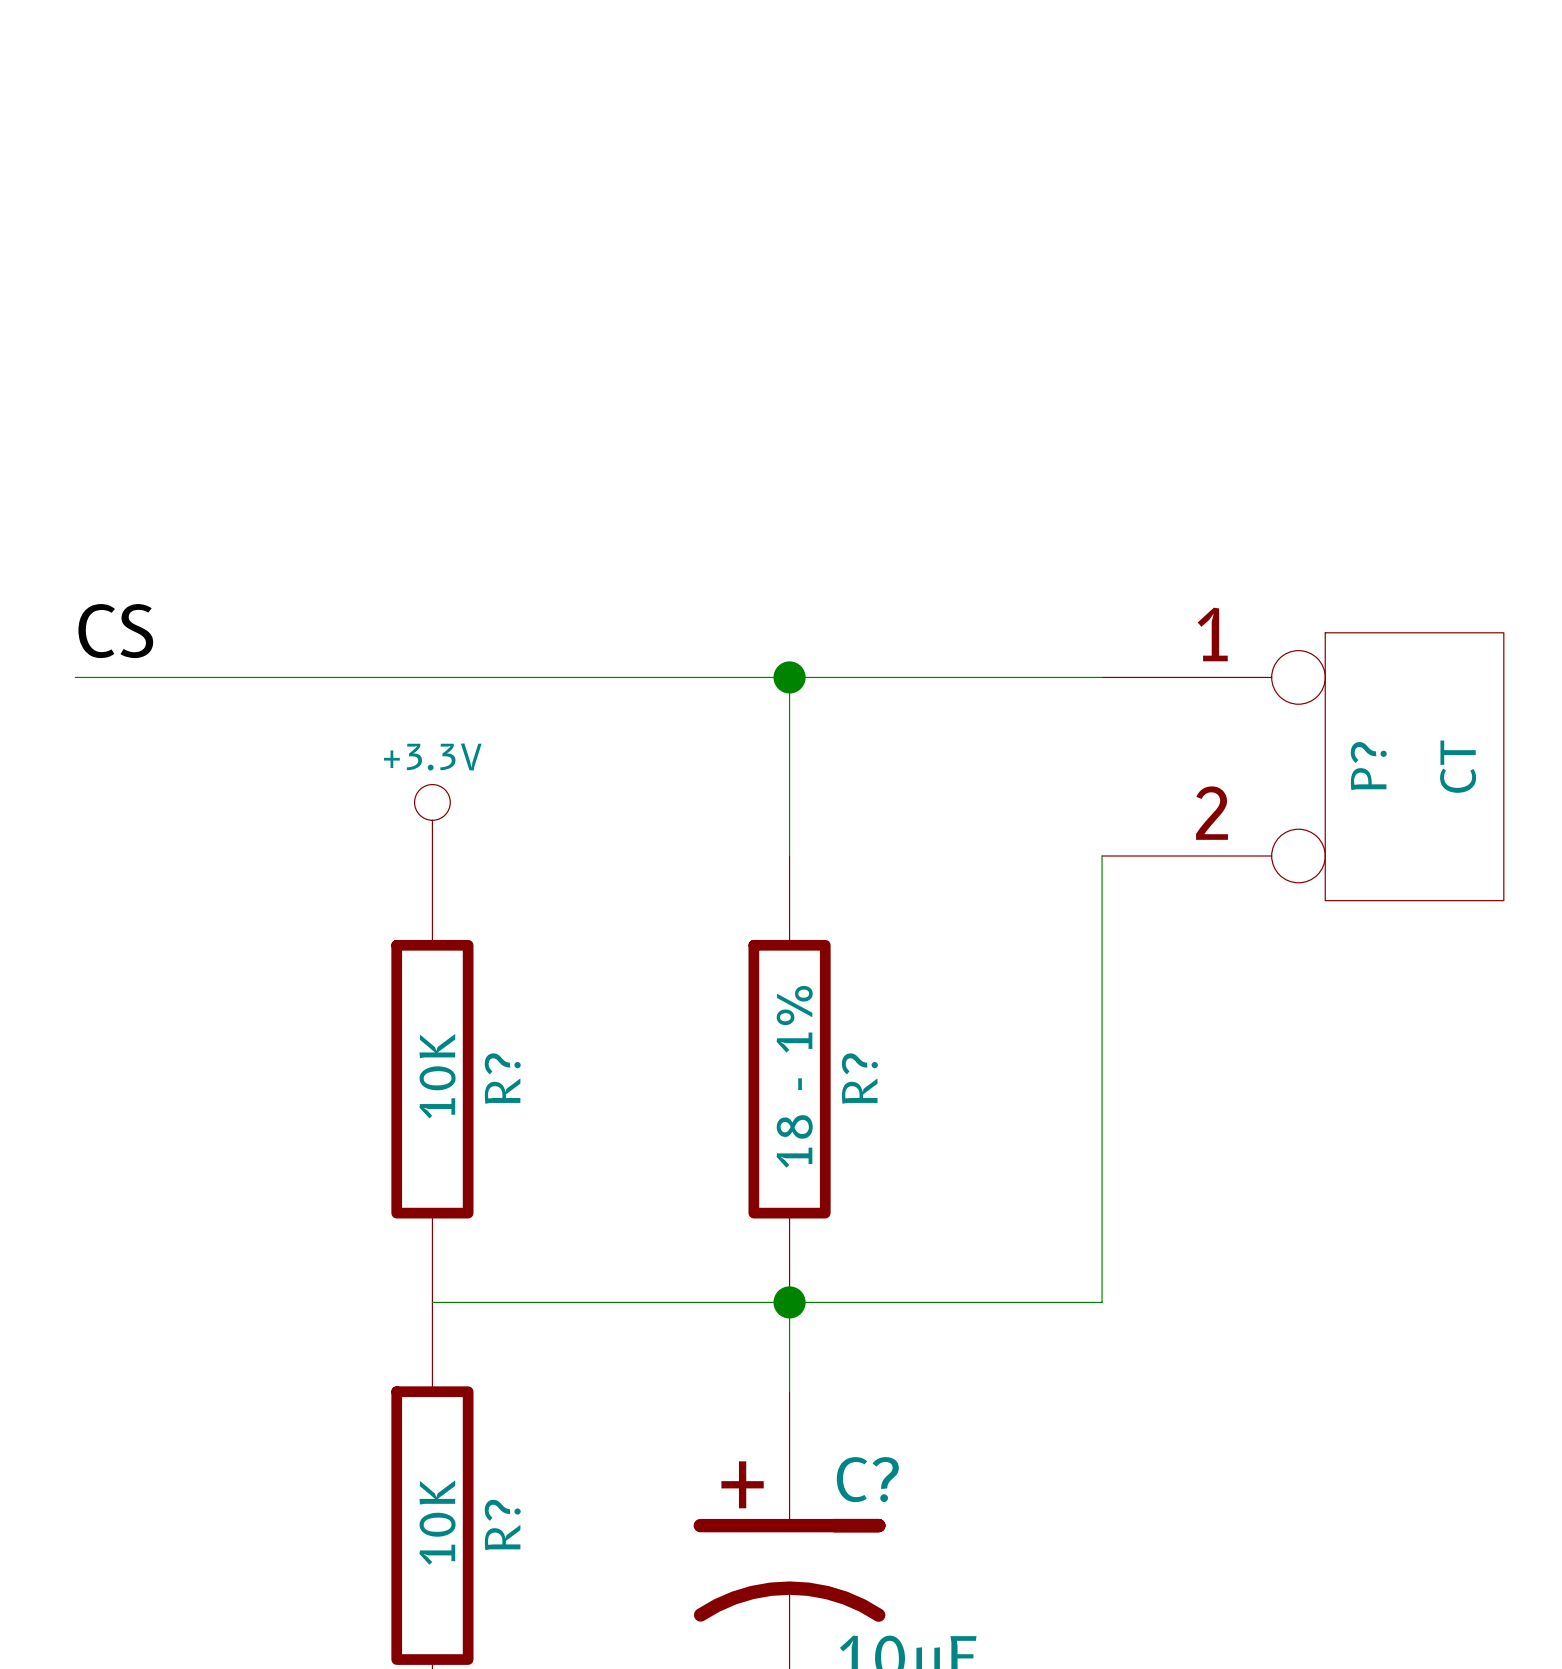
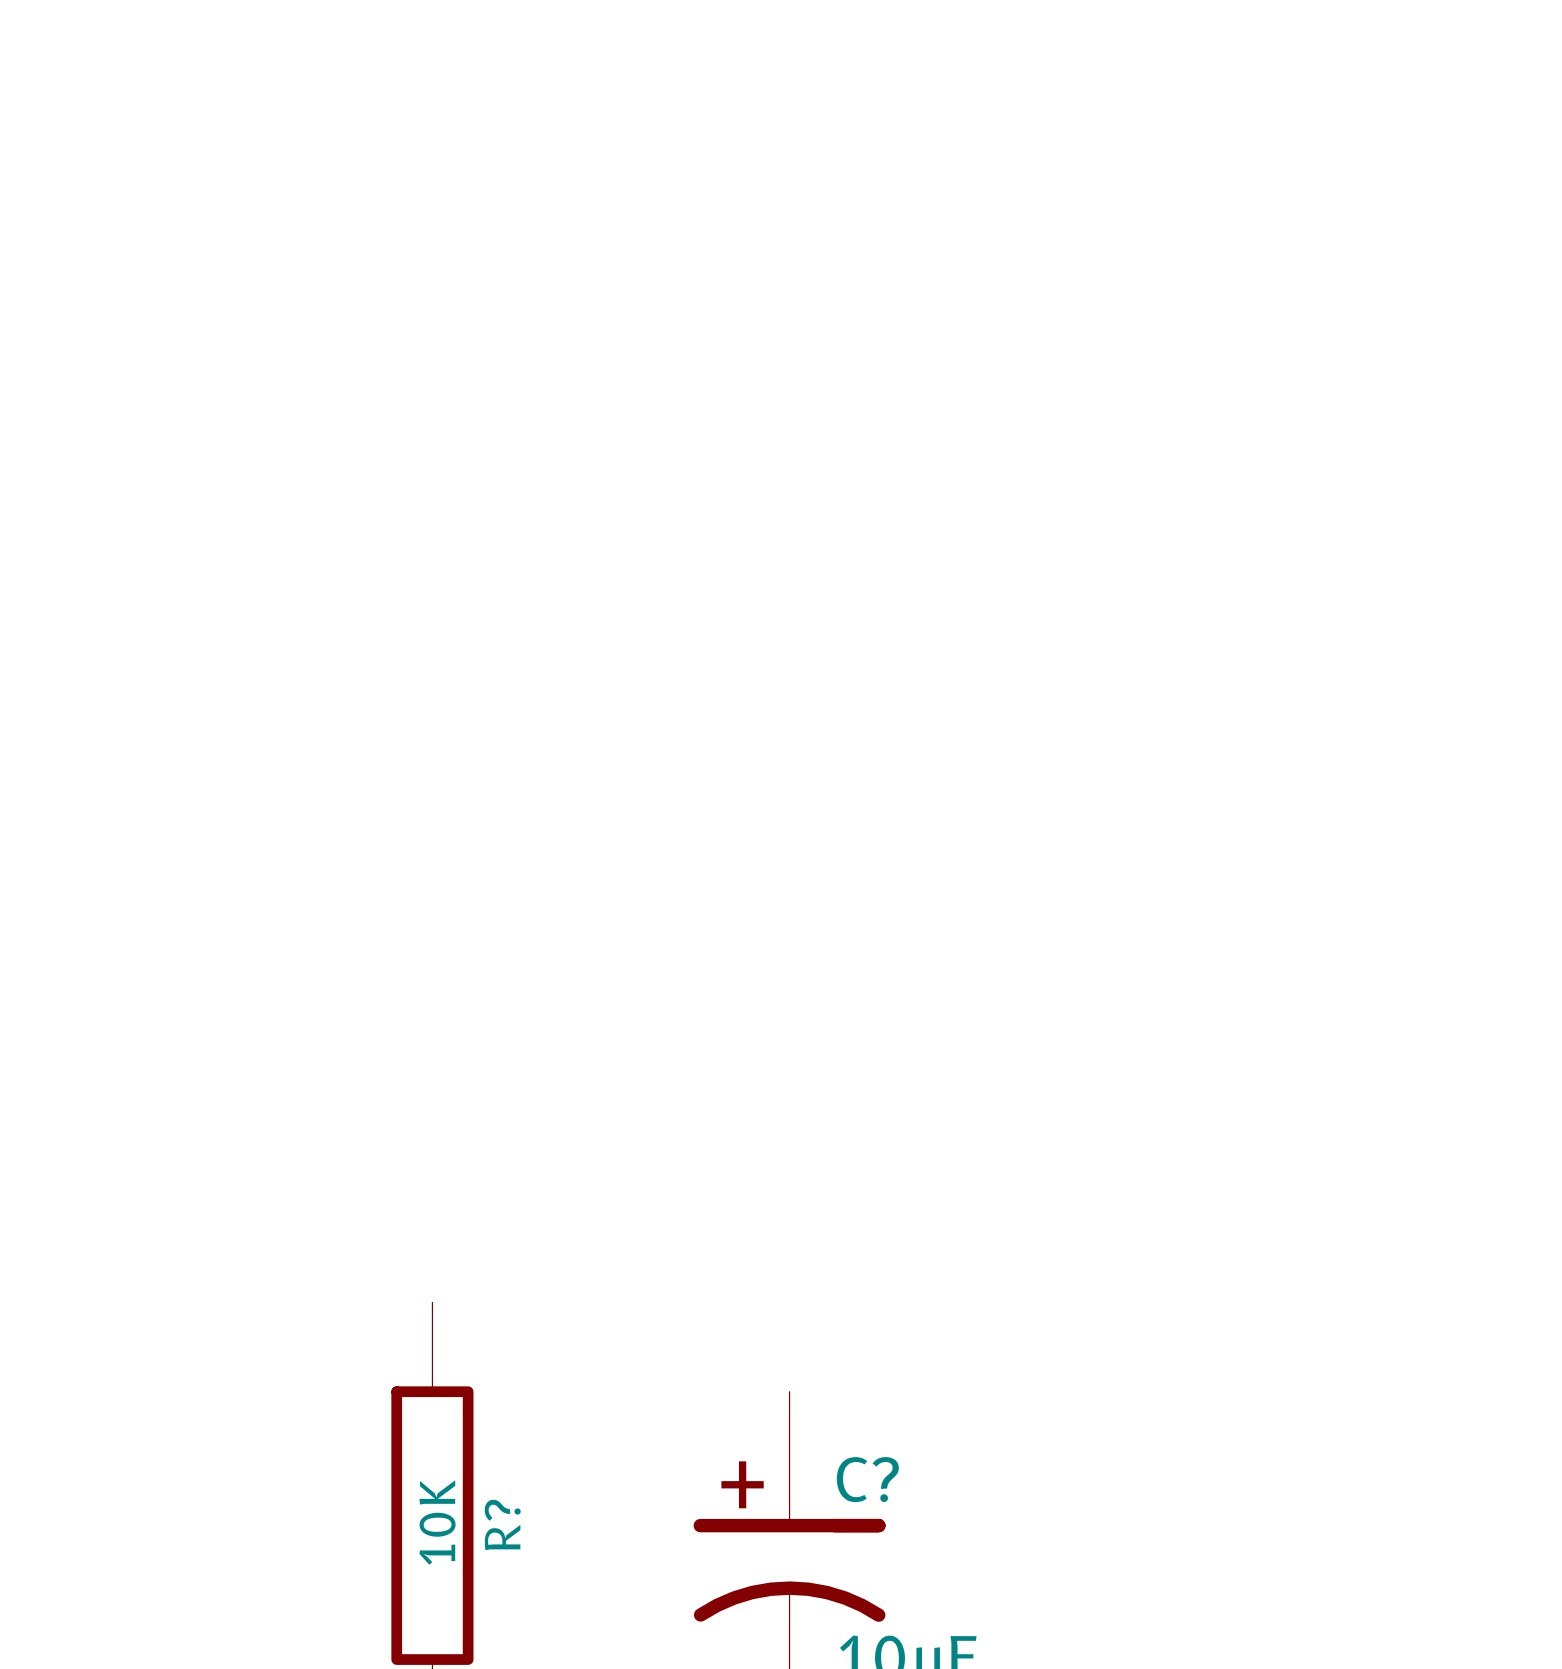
label: CS (115, 631) -> none
wire: (75, 677) (1102, 677) -> none
wire: (789, 677) (789, 856) -> none
junction: (789, 677) -> none
P?: CT (1302, 766) -> none
power symbol: +3.3V (432, 820) -> none
wire: (1102, 856) (1102, 1302) (432, 1302) -> none
R?: 10K (432, 1079) -> none
R?: 18 - 1% (789, 1079) -> none
wire: (789, 1302) (789, 1391) -> none
junction: (789, 1302) -> none

